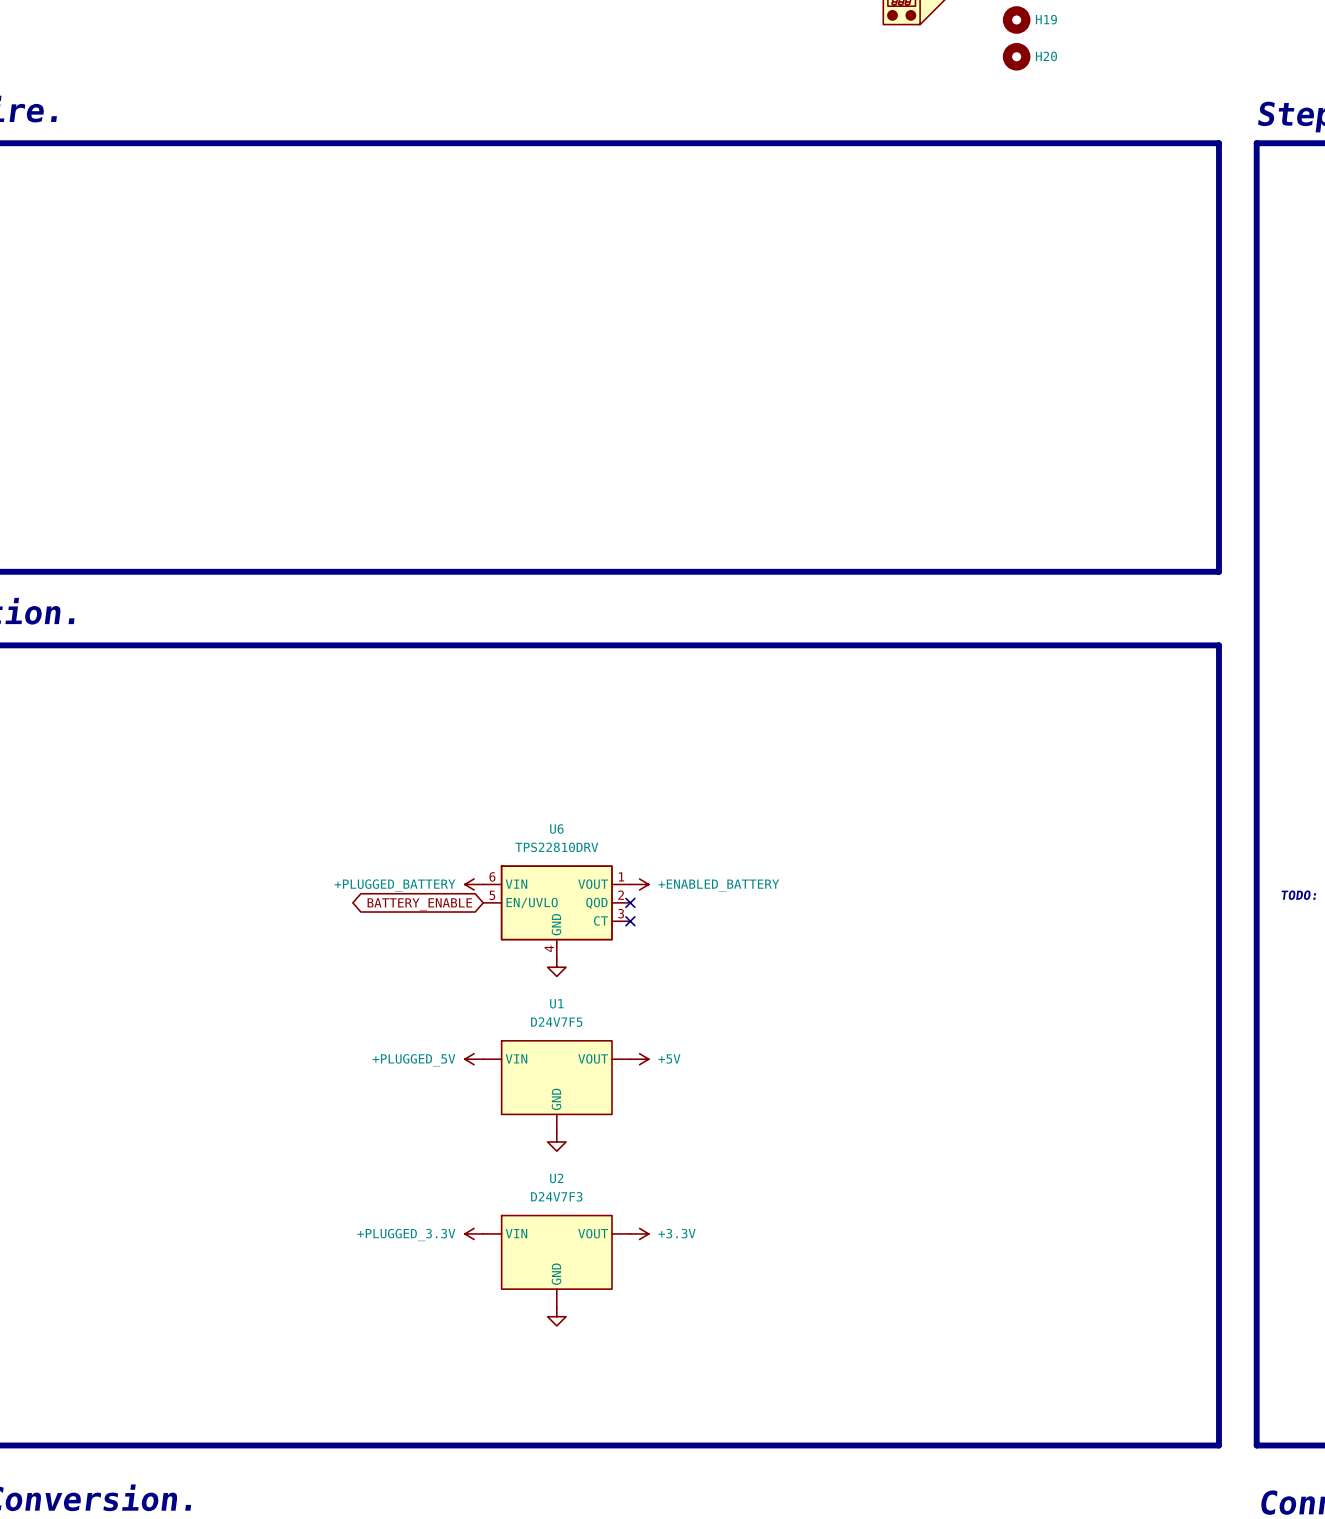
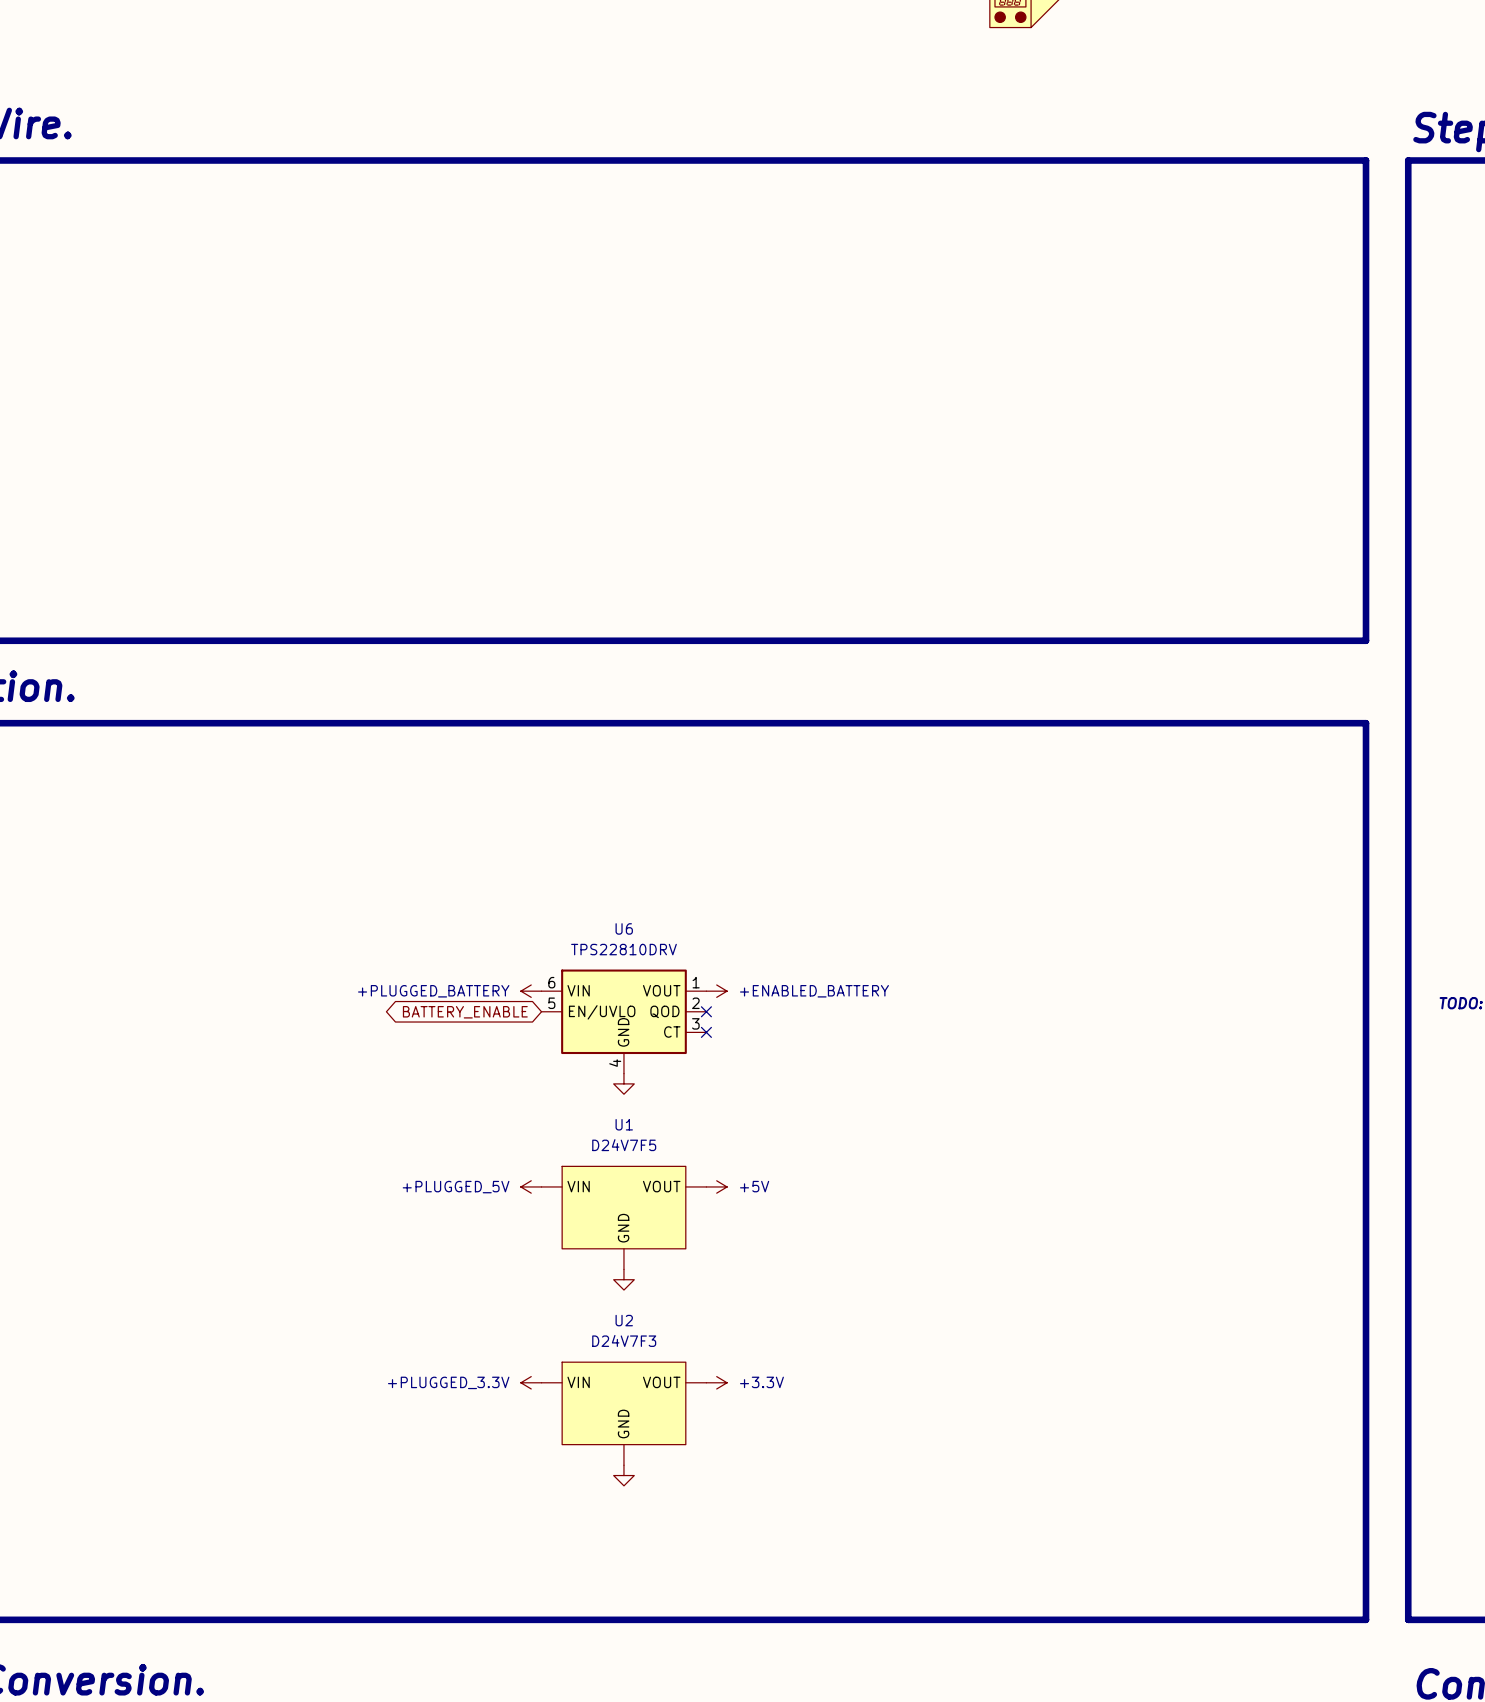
H19: (1016, 19) -> none
H20: (1016, 56) -> none

